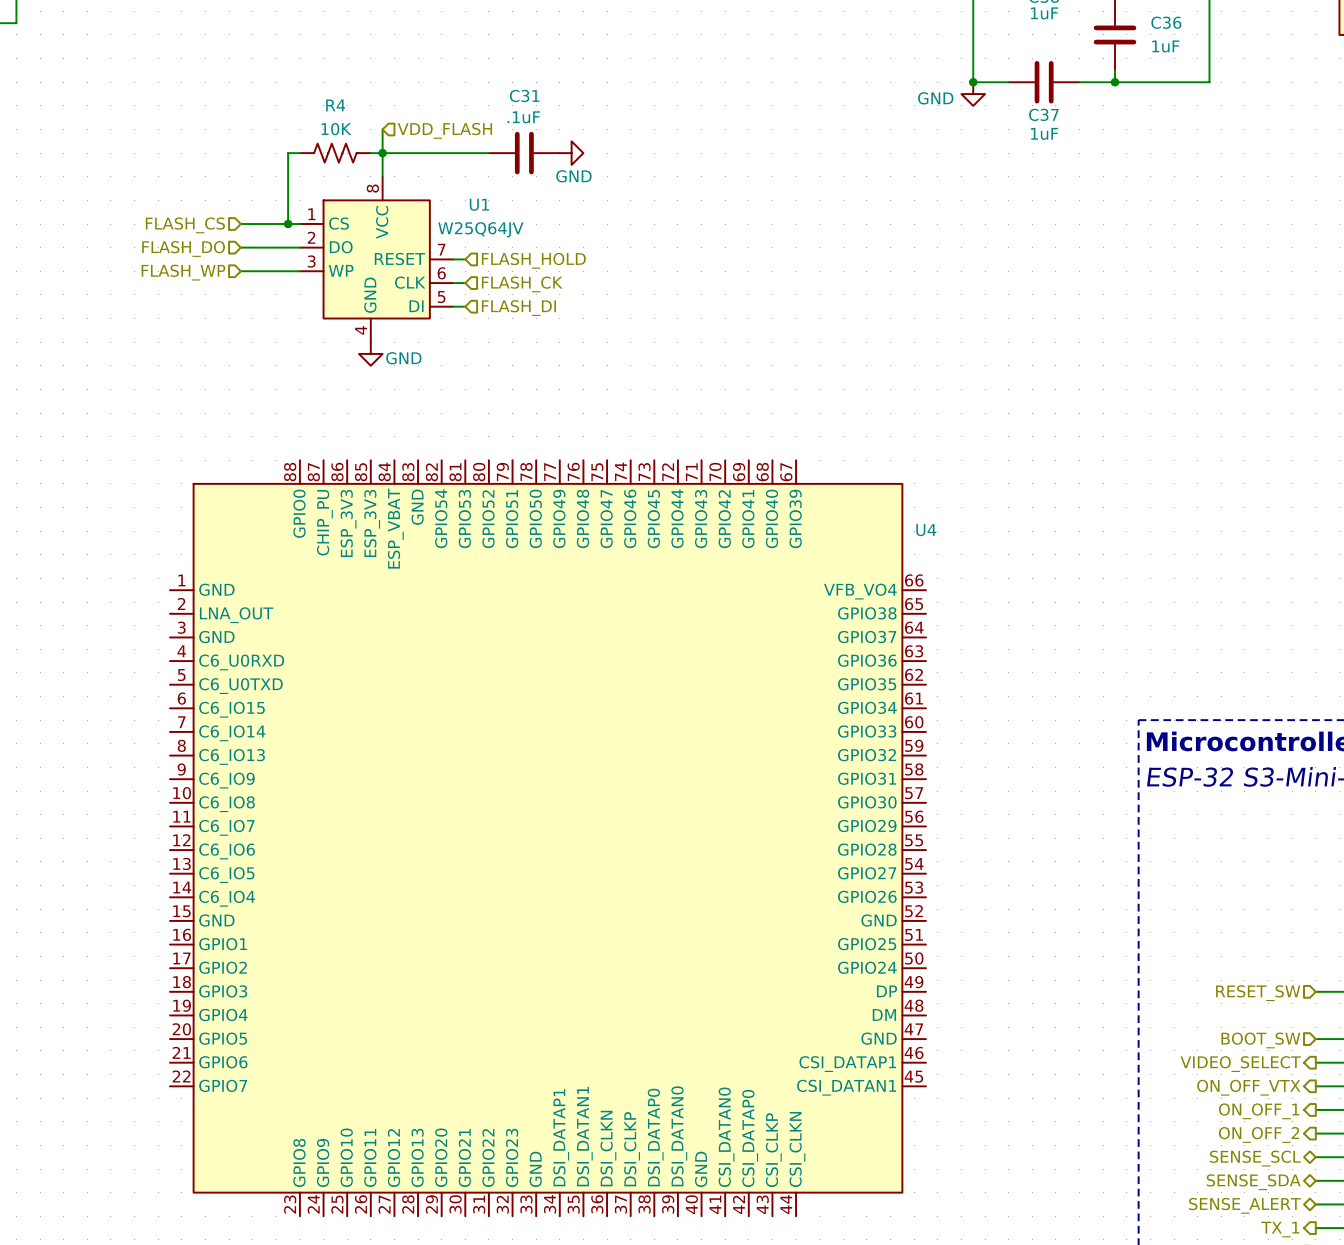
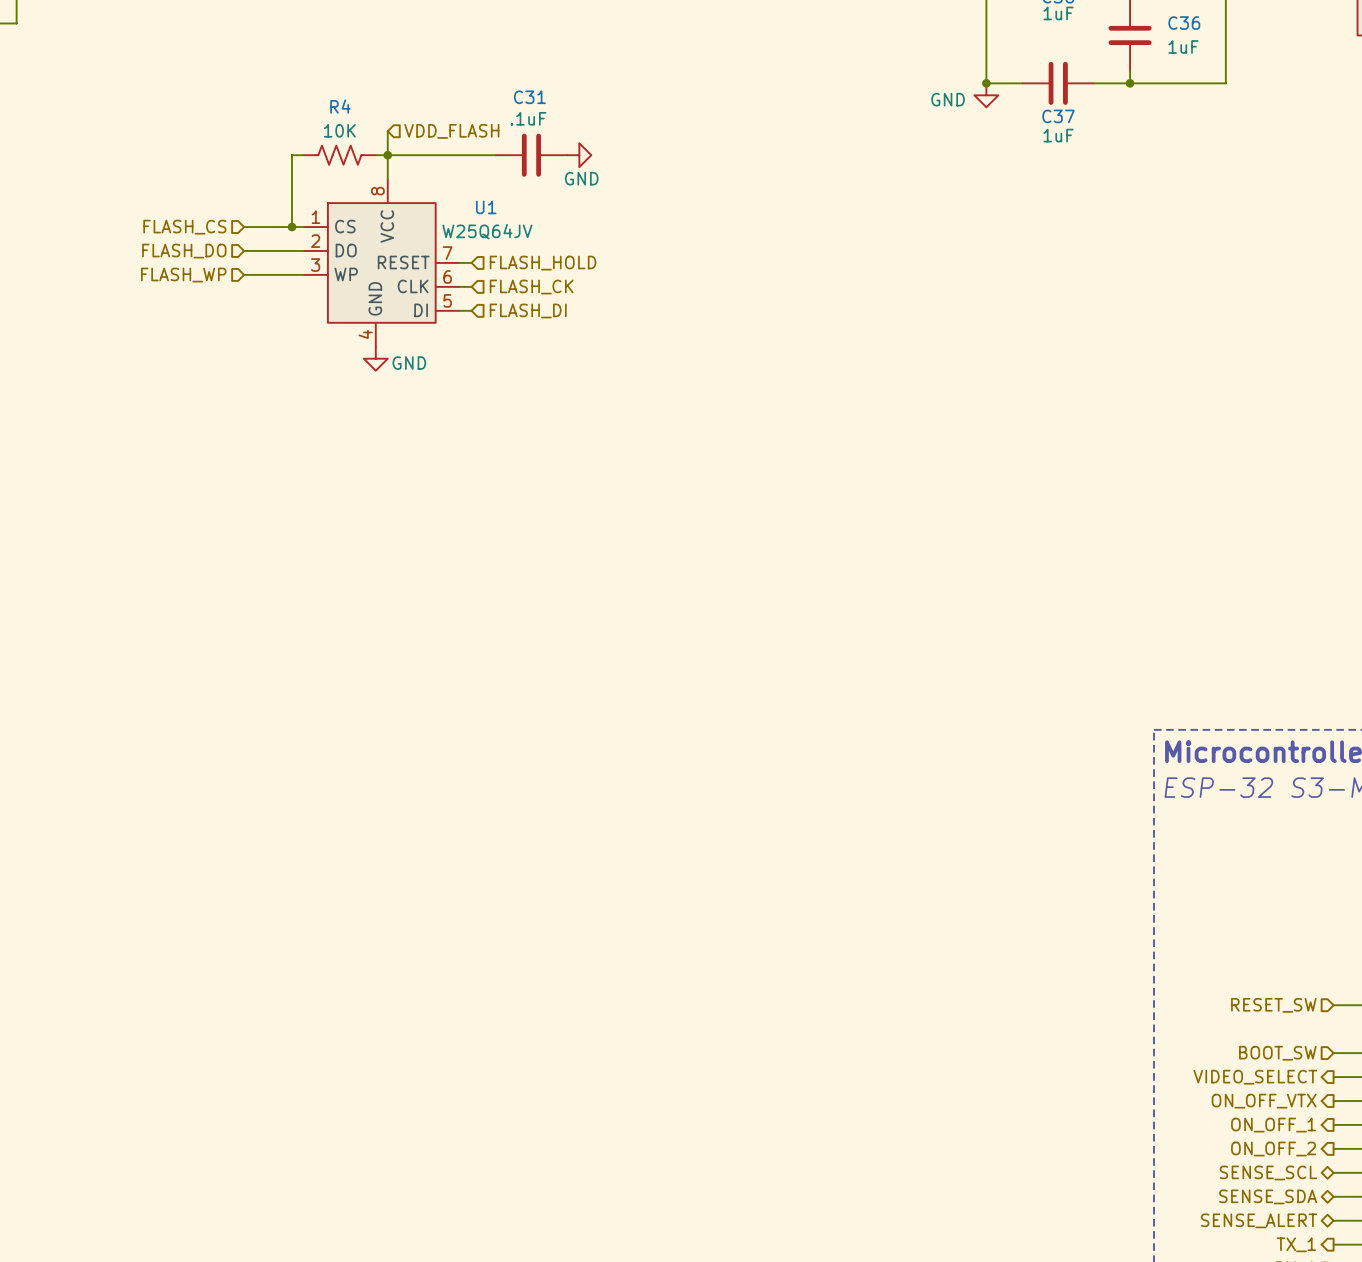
U4: (530, 838) -> none

